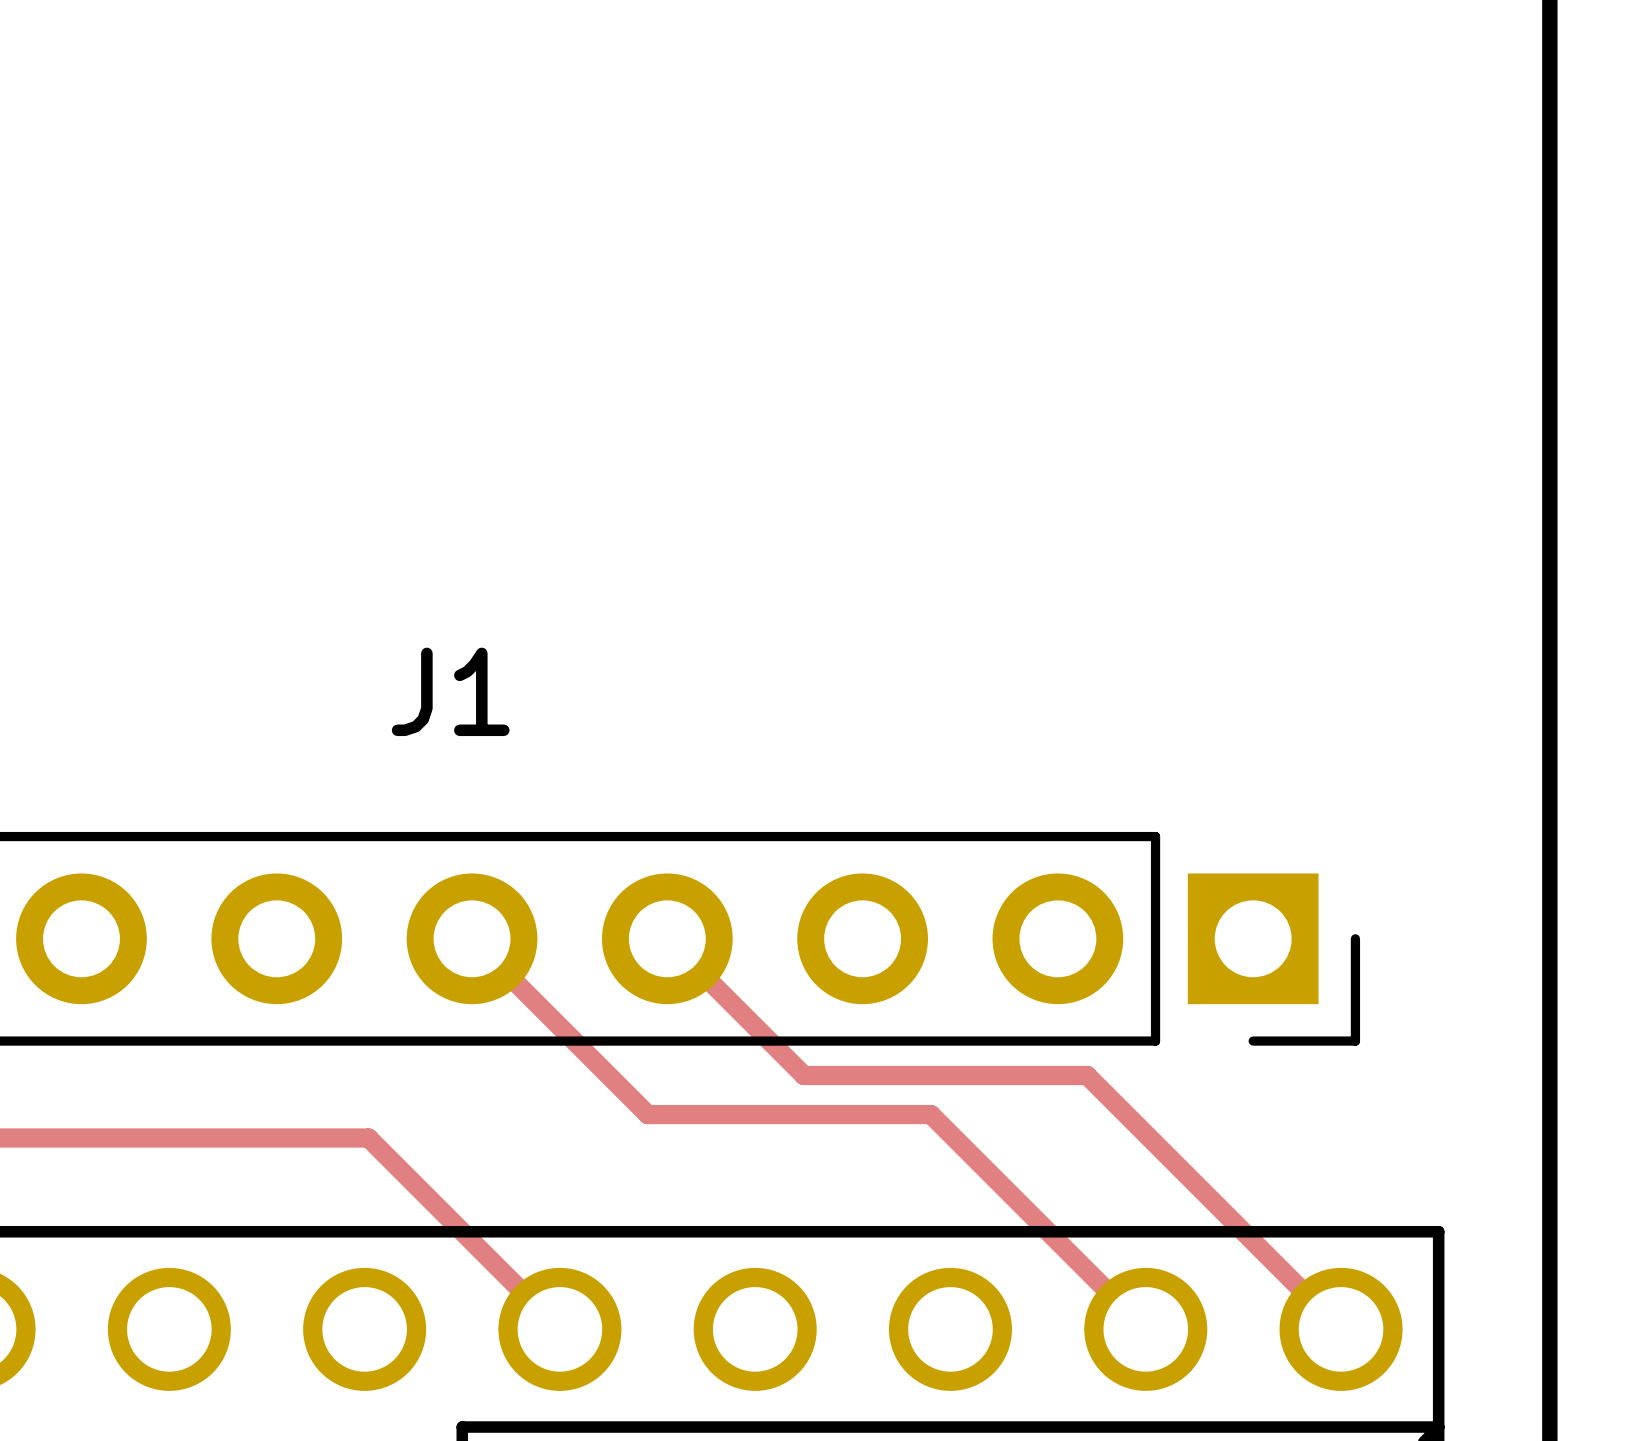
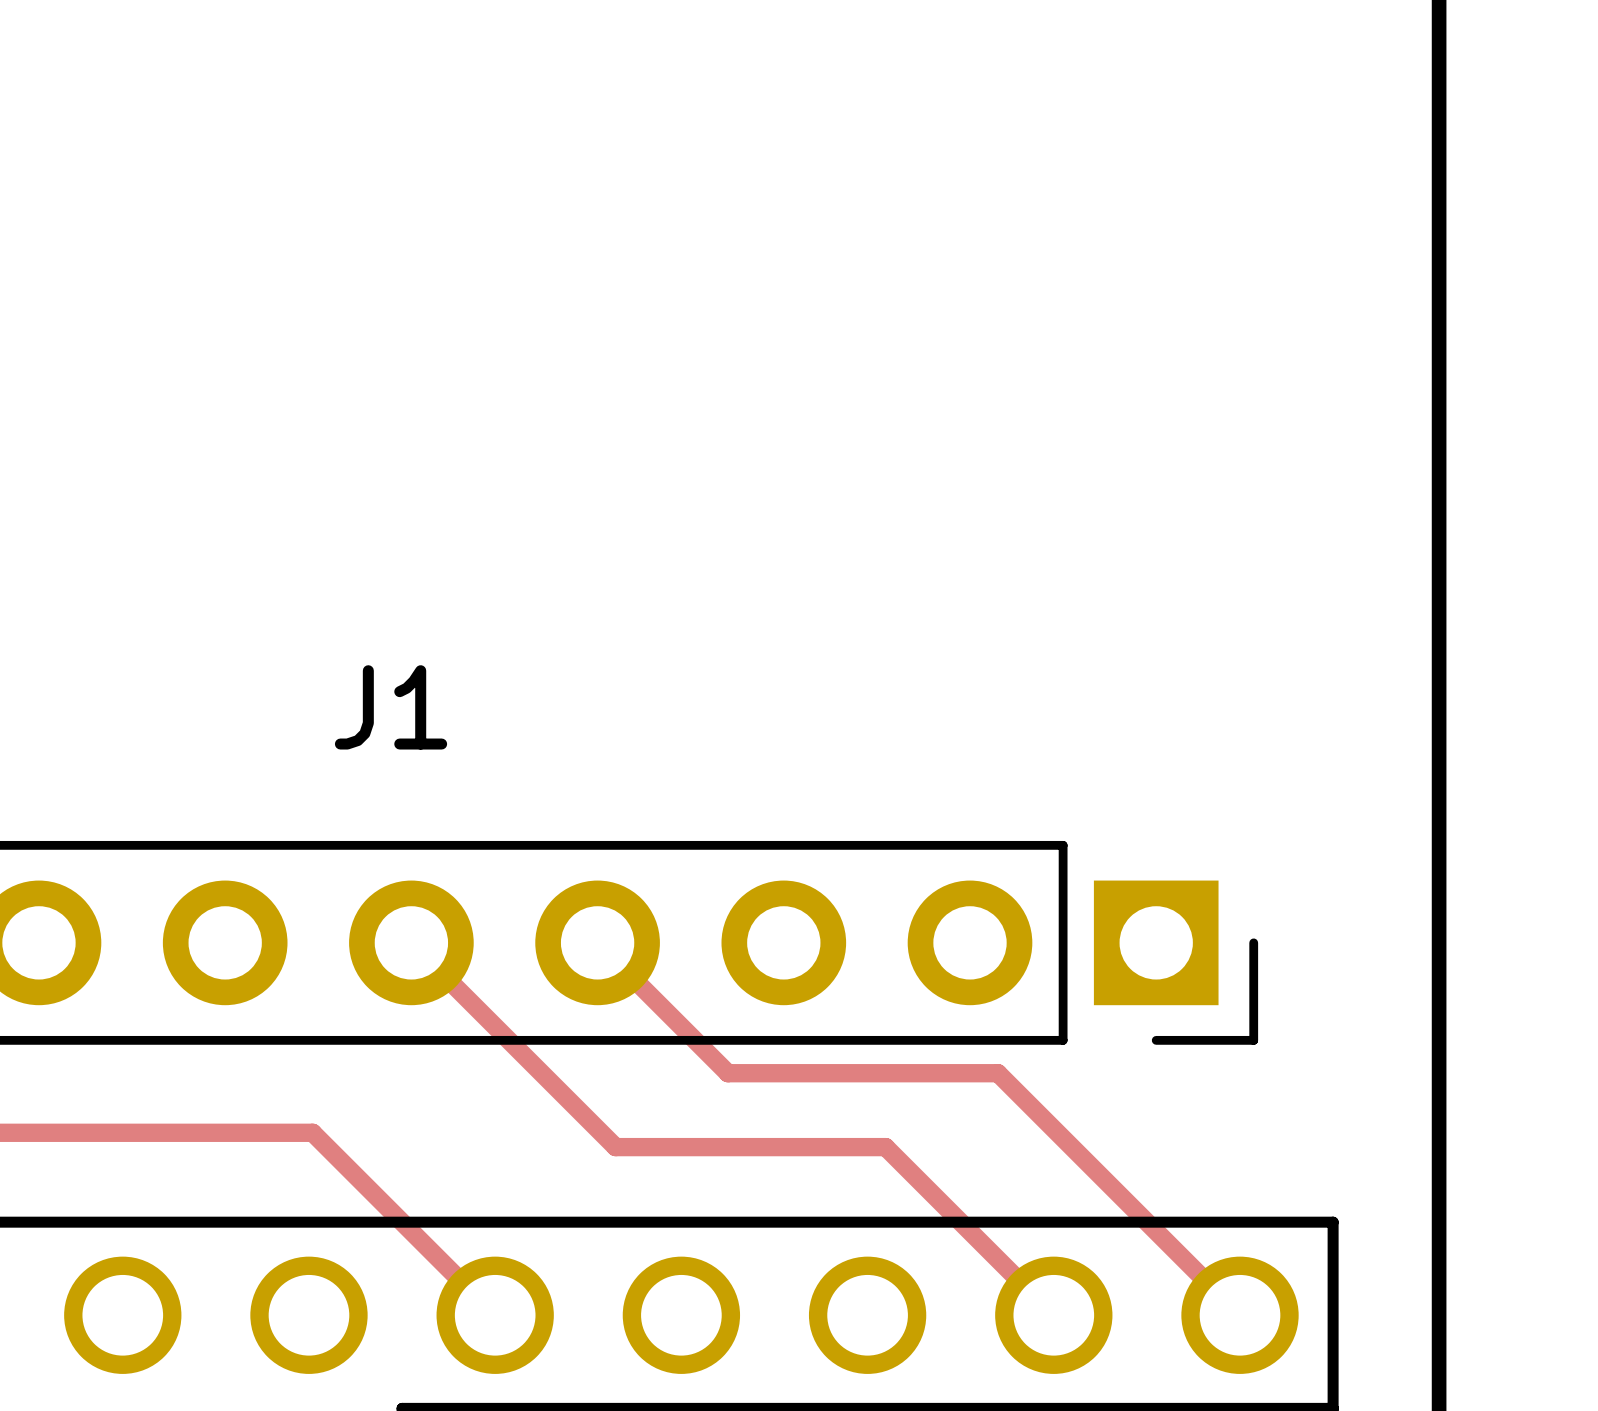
track: (647, 1114) (930, 1114) (969, 1153) -> (578, 1110) (615, 1147) (885, 1147)

